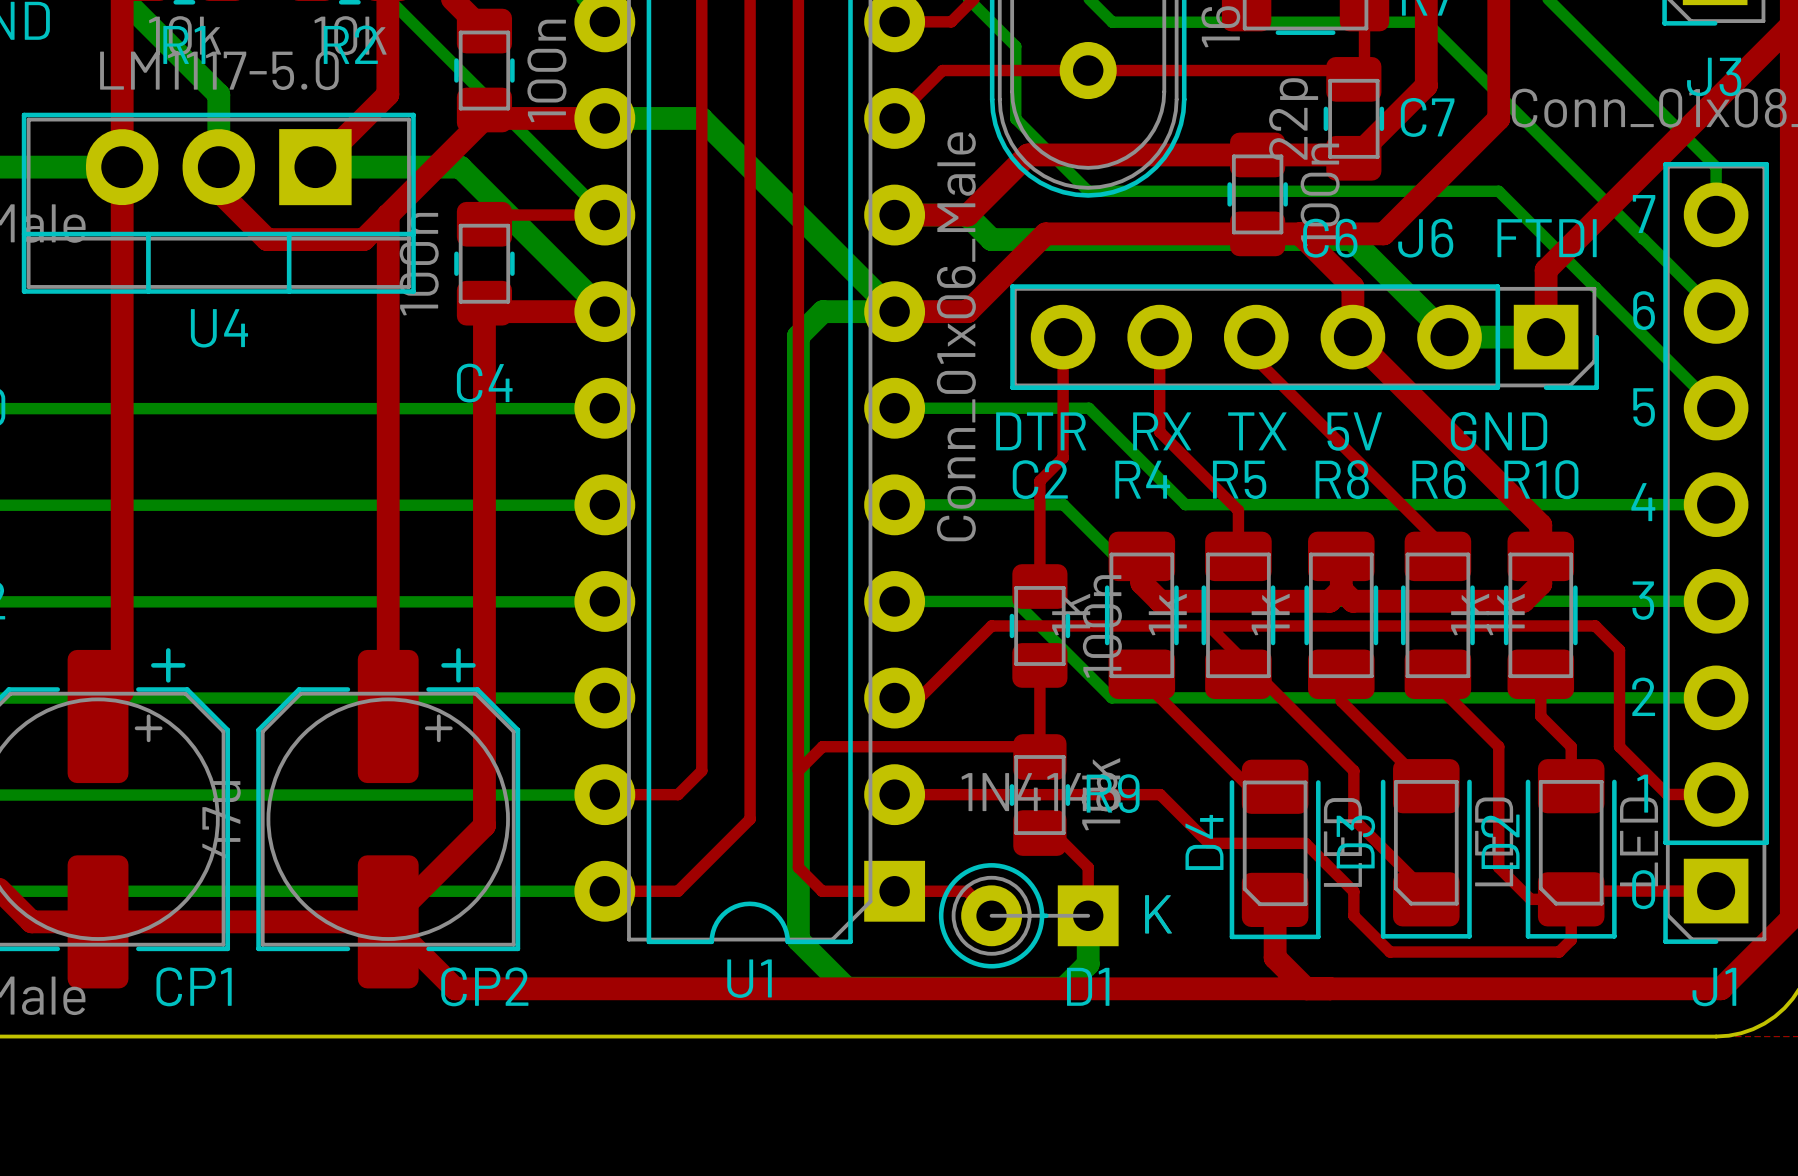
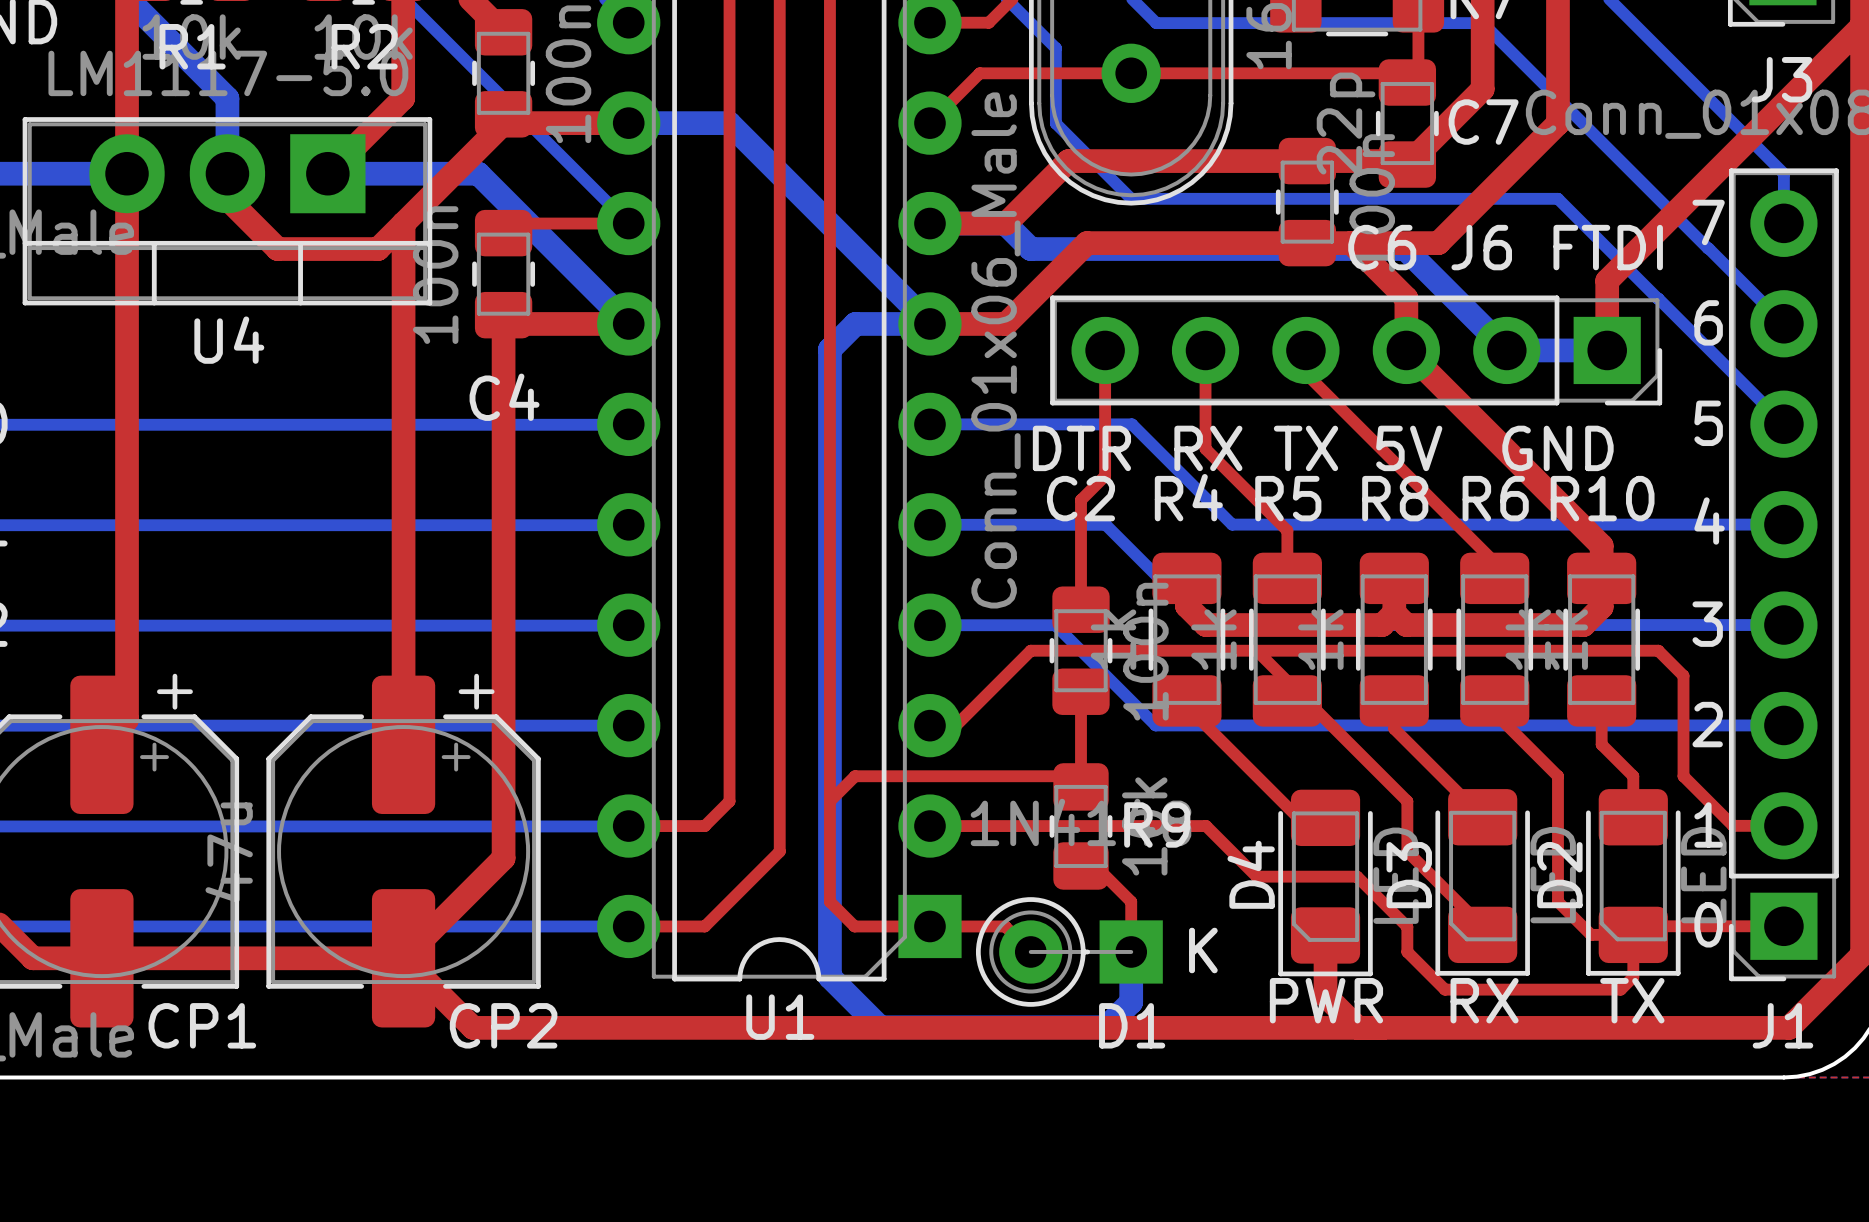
text: none -> PWR (1326, 1000)
text: none -> RX (1484, 1000)
text: none -> TX (1632, 1000)

